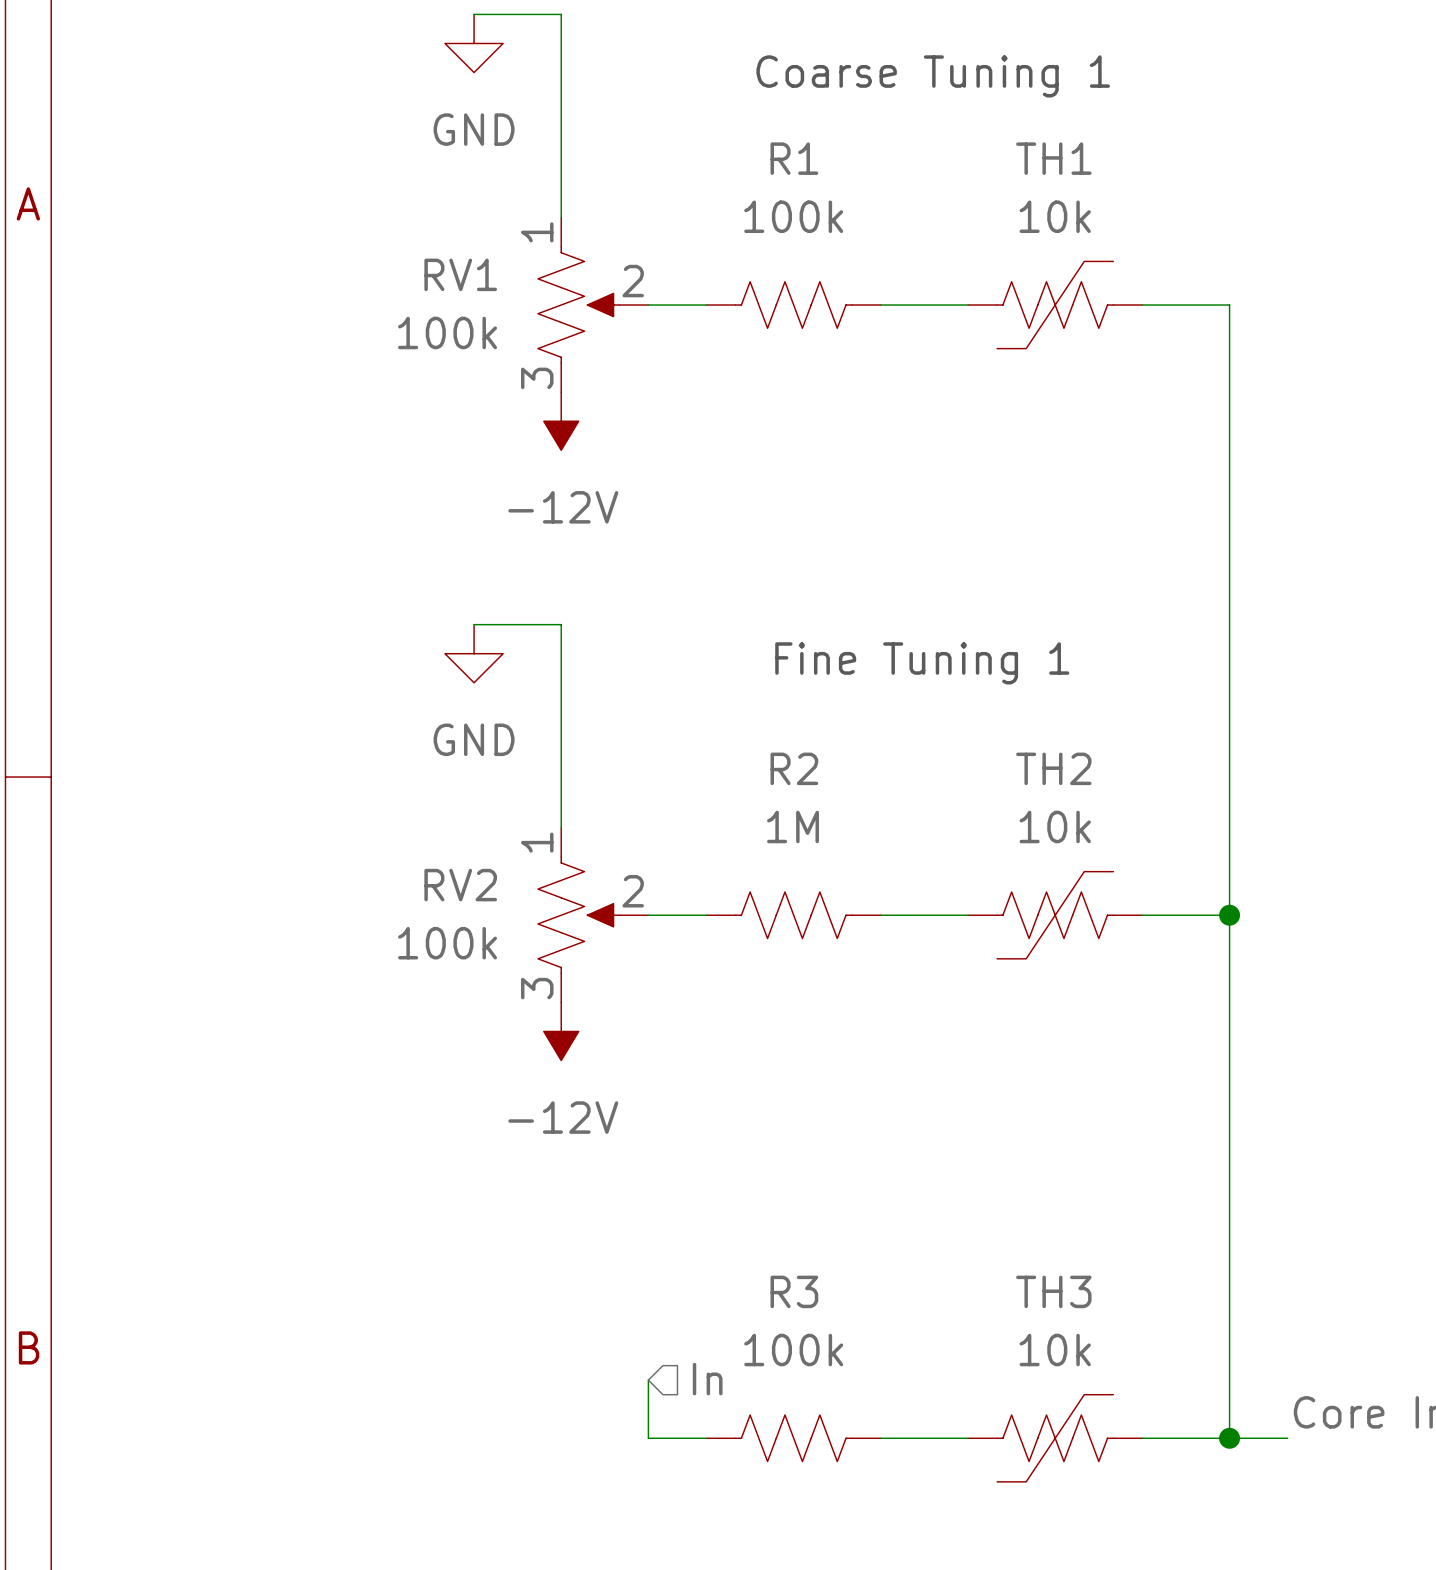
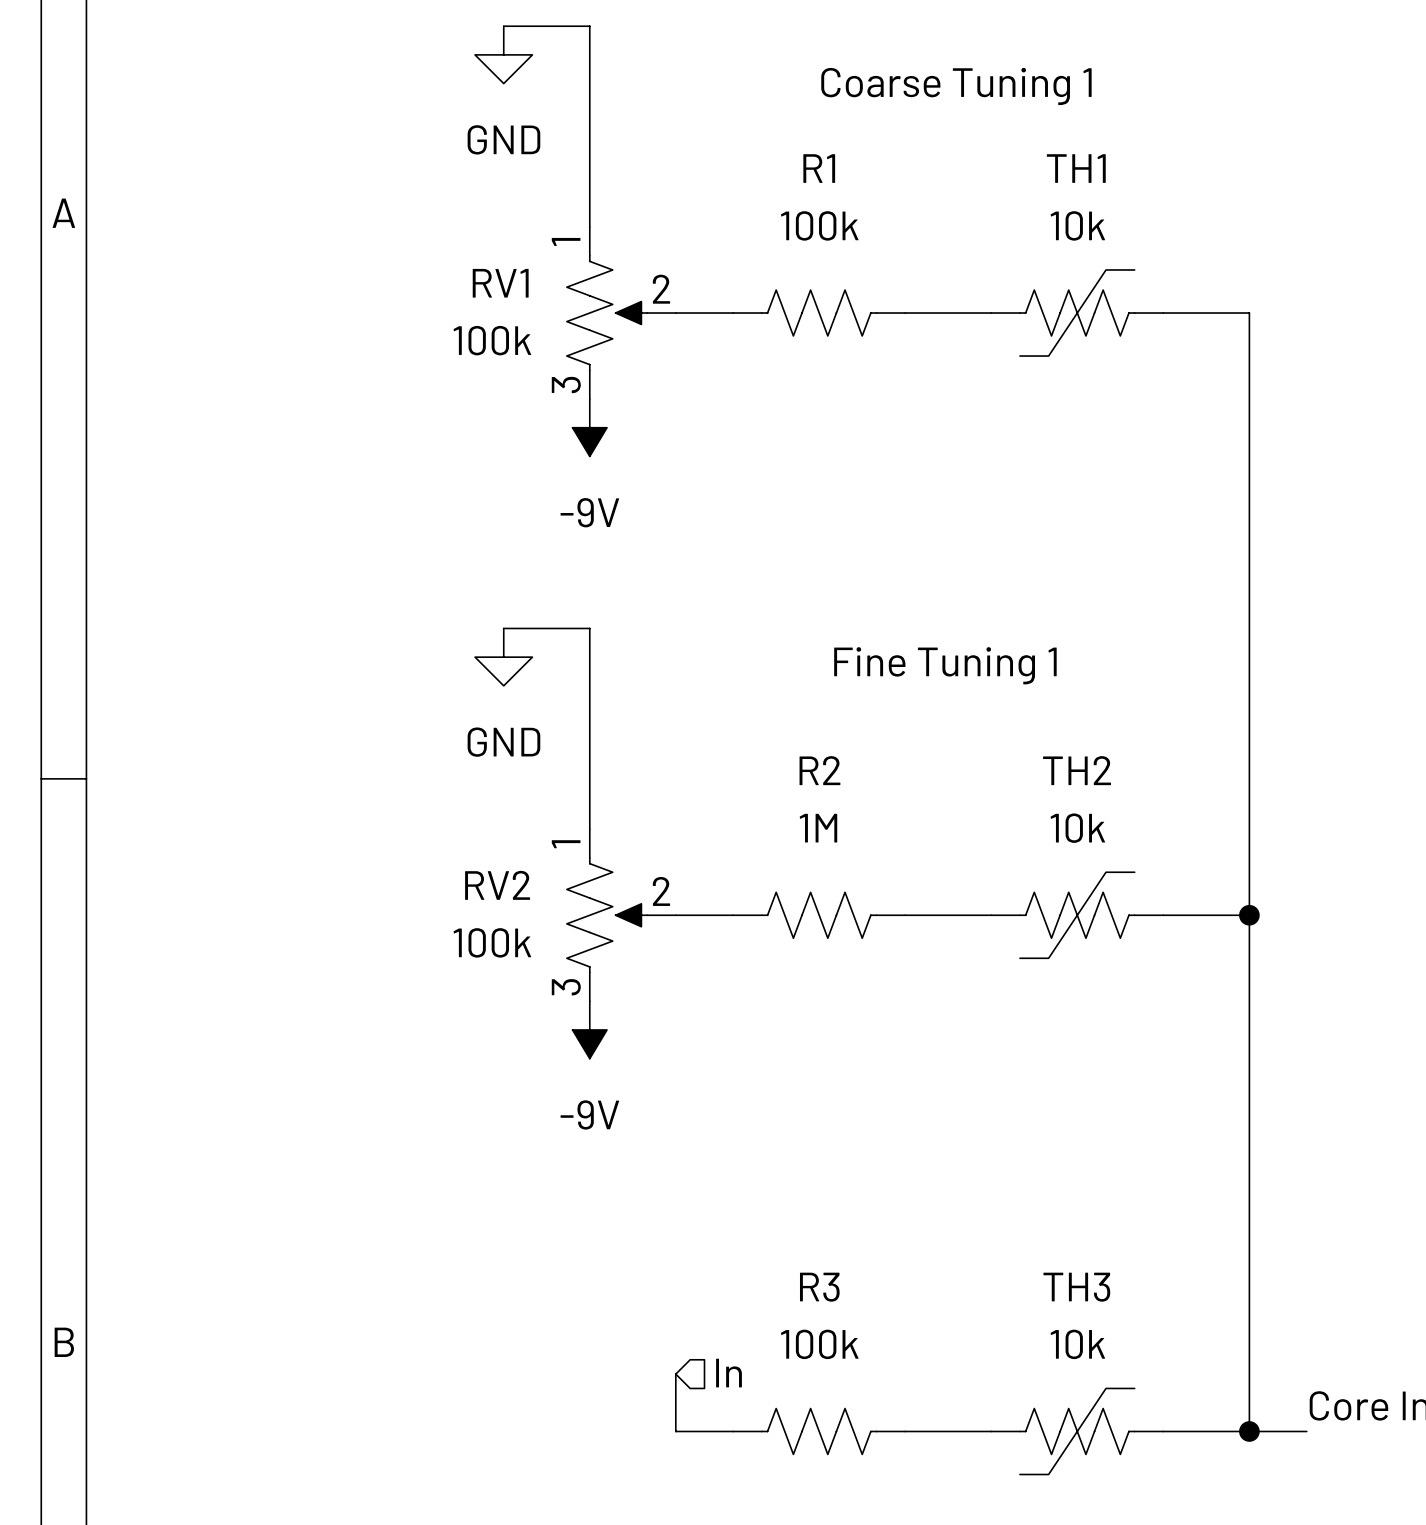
power symbol: -12V (561, 421) -> -9V (589, 427)
power symbol: -12V (561, 1031) -> -9V (589, 1029)

